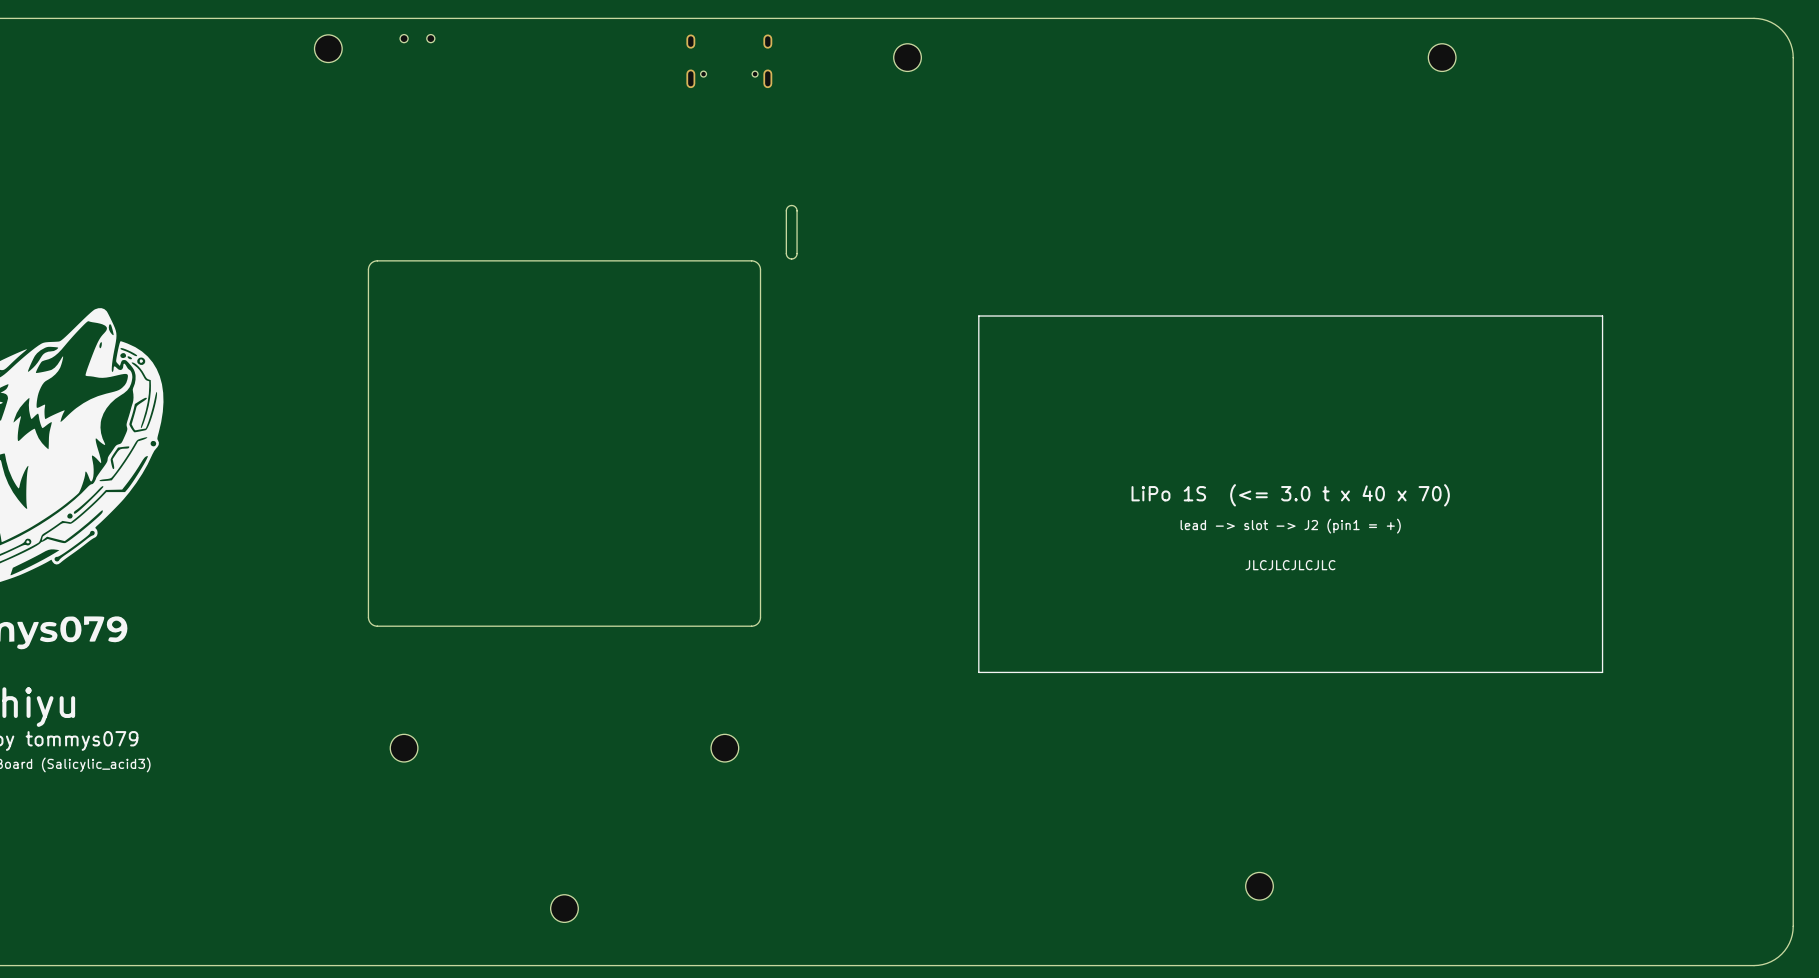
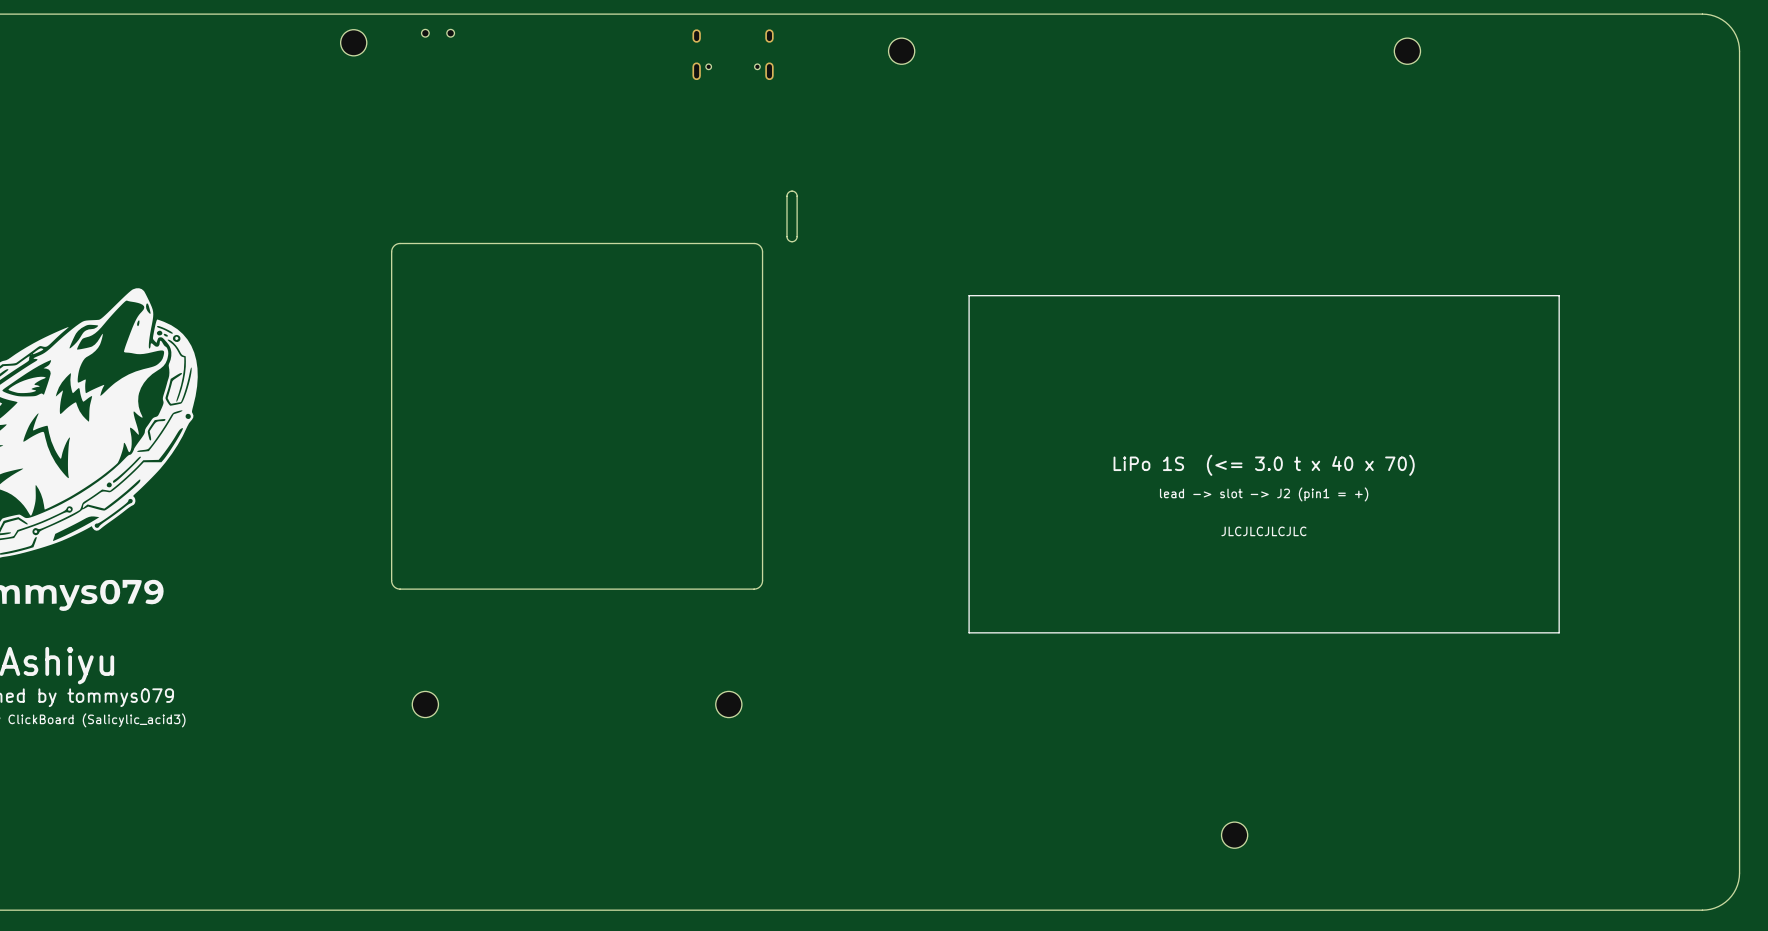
part: (564, 908) -> none

